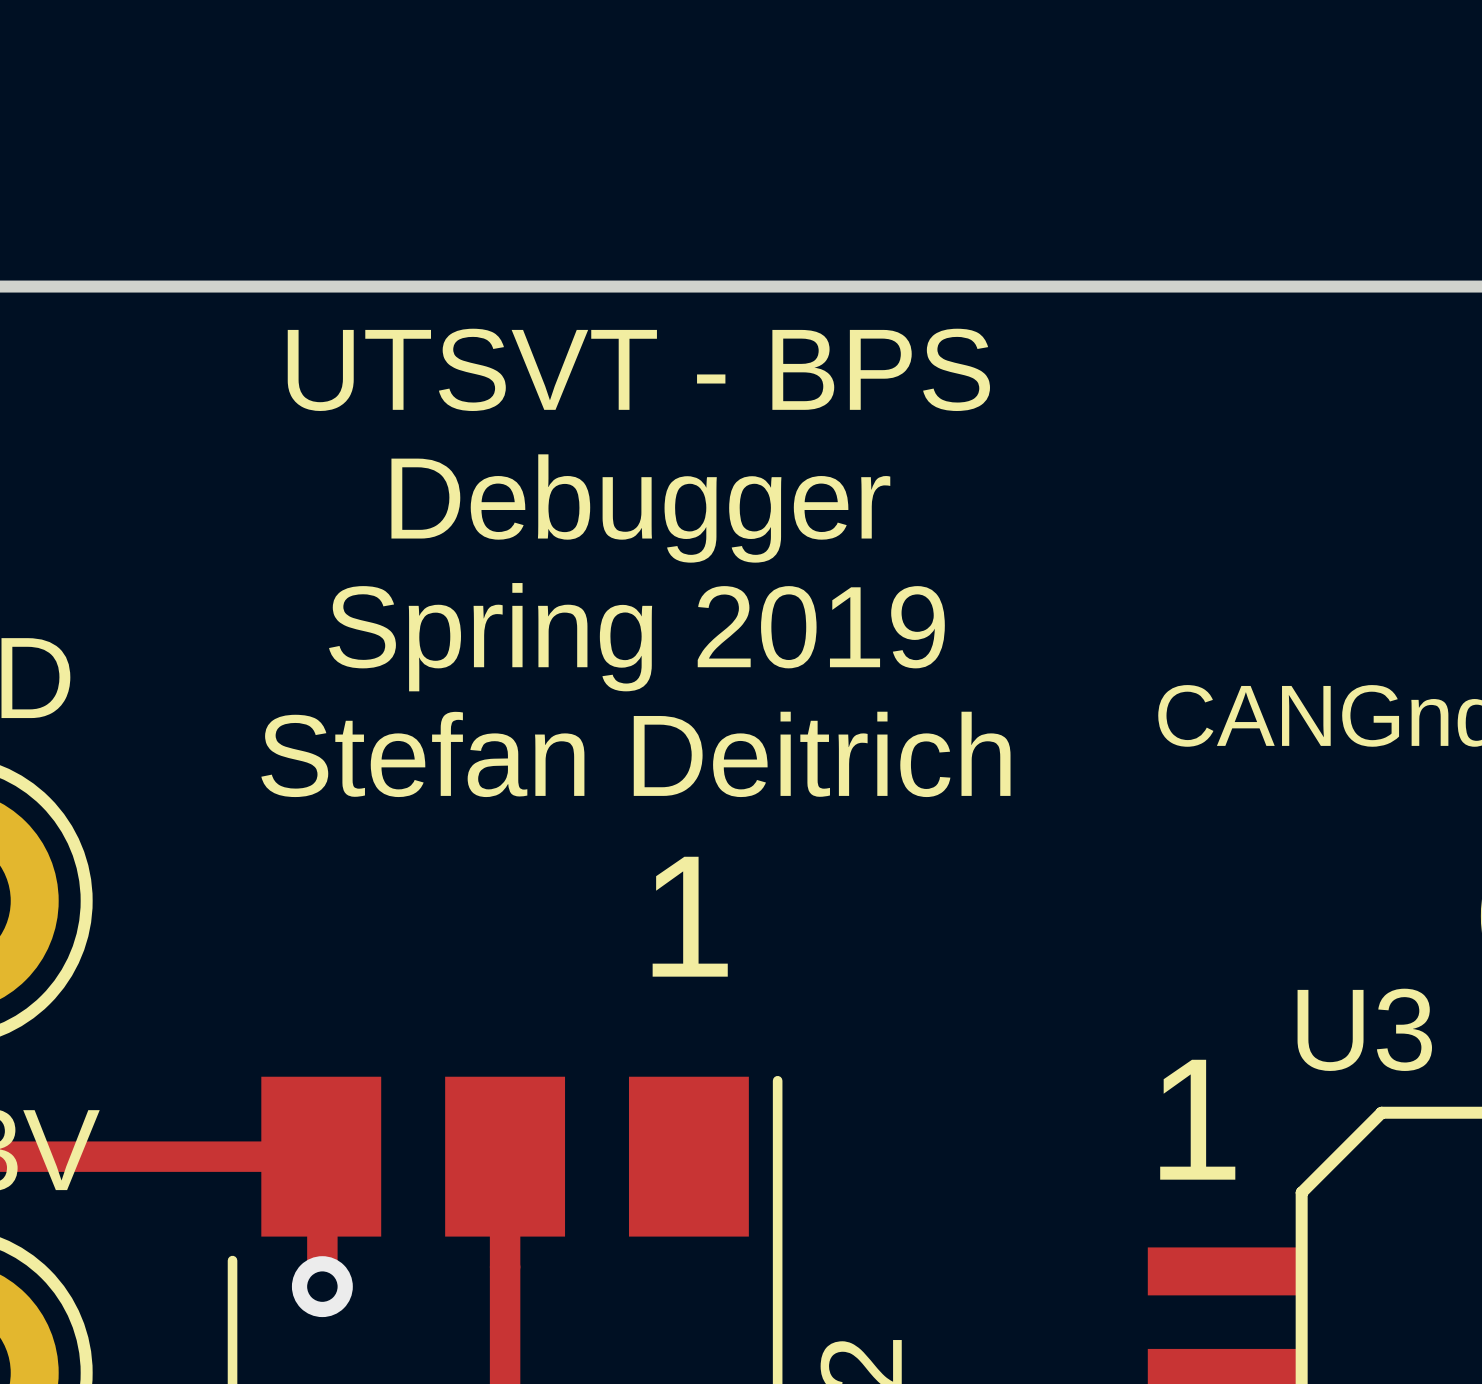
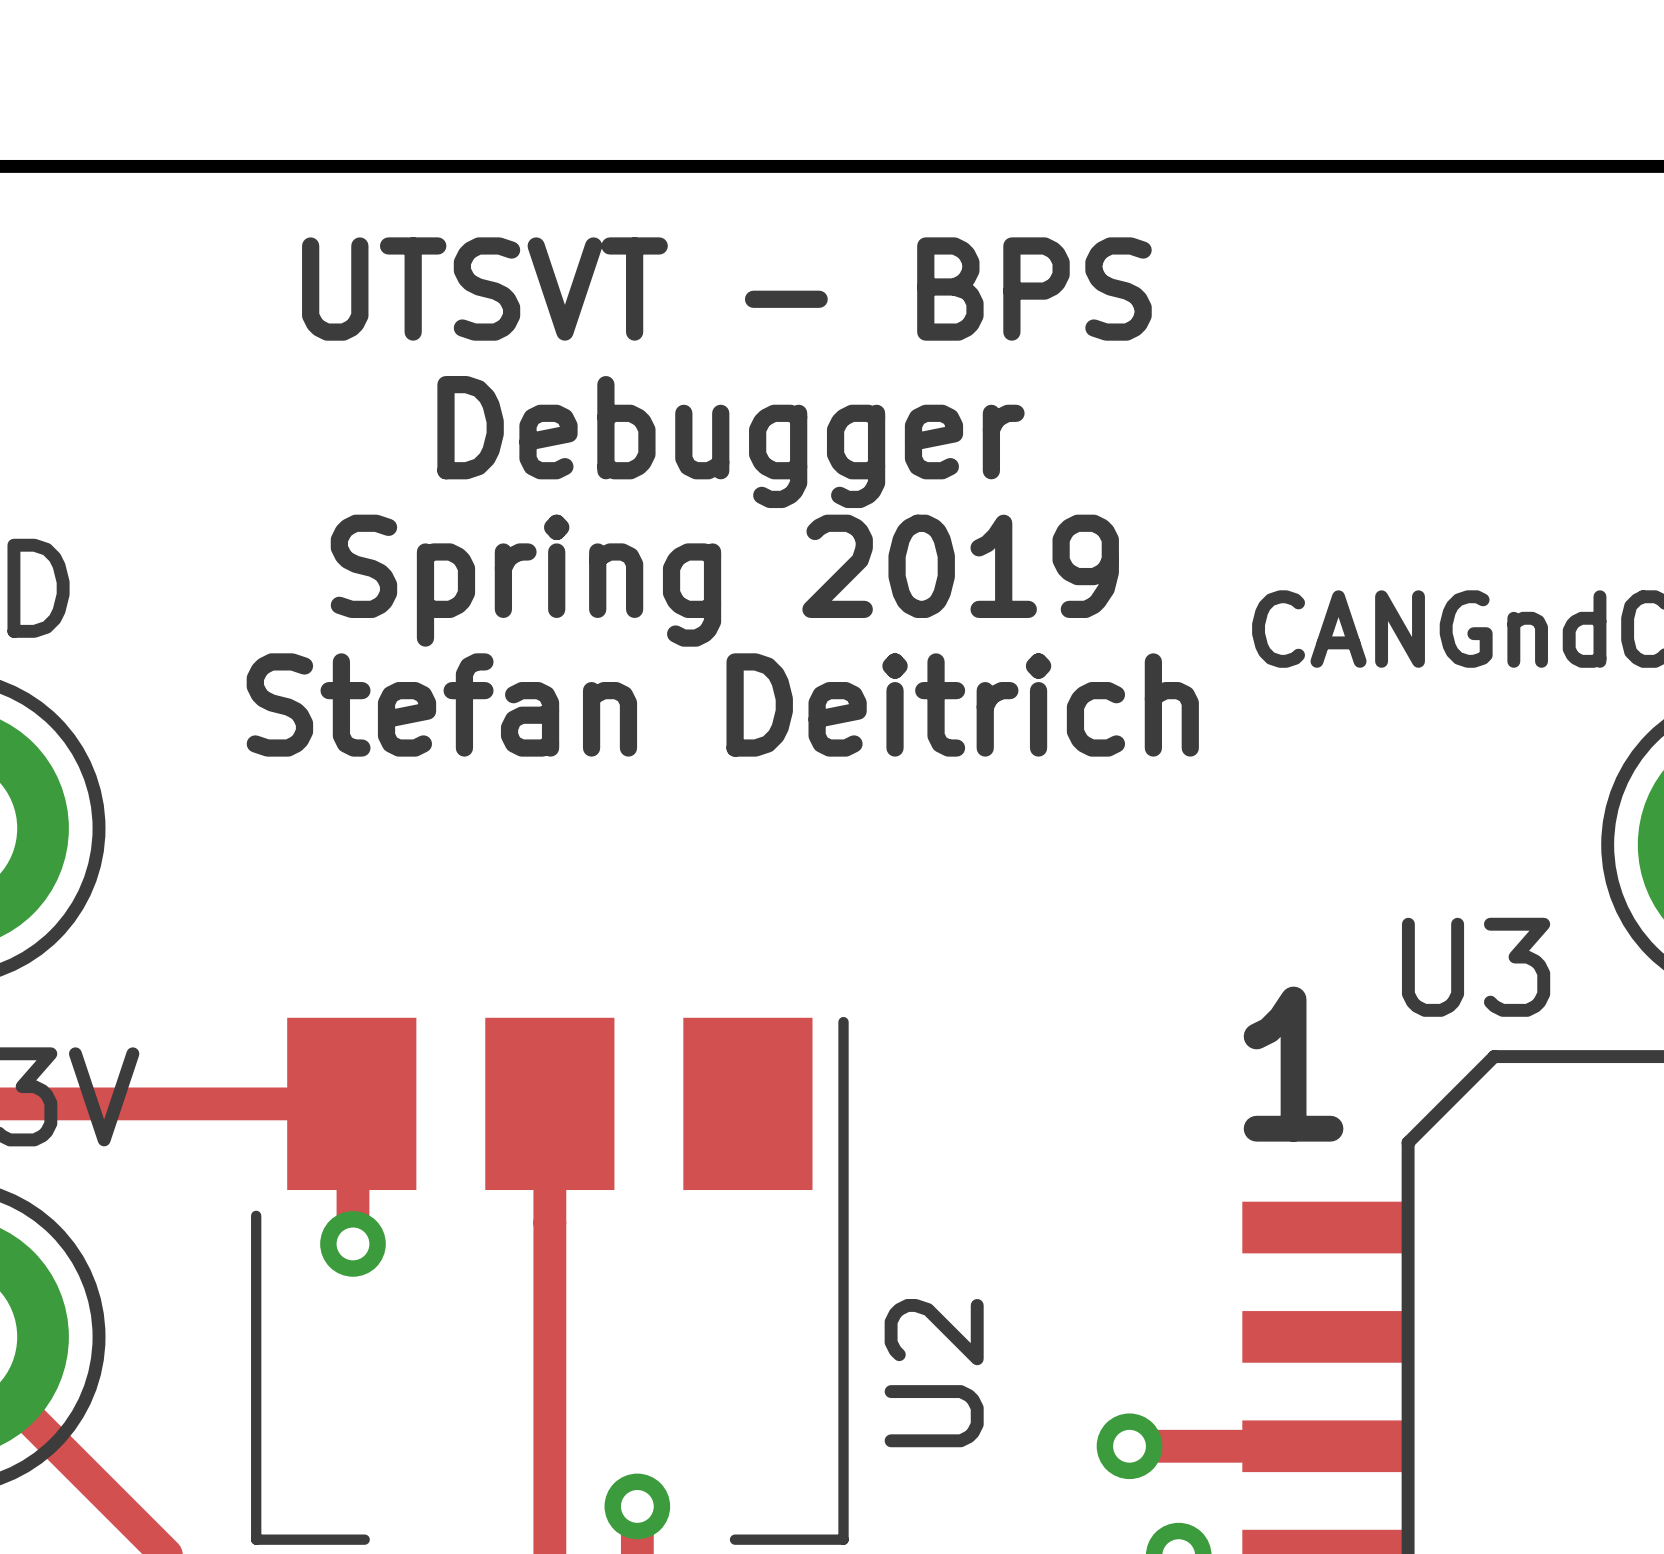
text position: UTSVT - BPS (638, 369) -> UTSVT - BPS (726, 289)
text position: Debugger (640, 508) -> Debugger (730, 442)
text position: Spring 2019 (636, 637) -> Spring 2019 (724, 580)
text position: Stefan Deitrich (635, 754) -> Stefan Deitrich (722, 704)
text: 1 (690, 916) -> none

